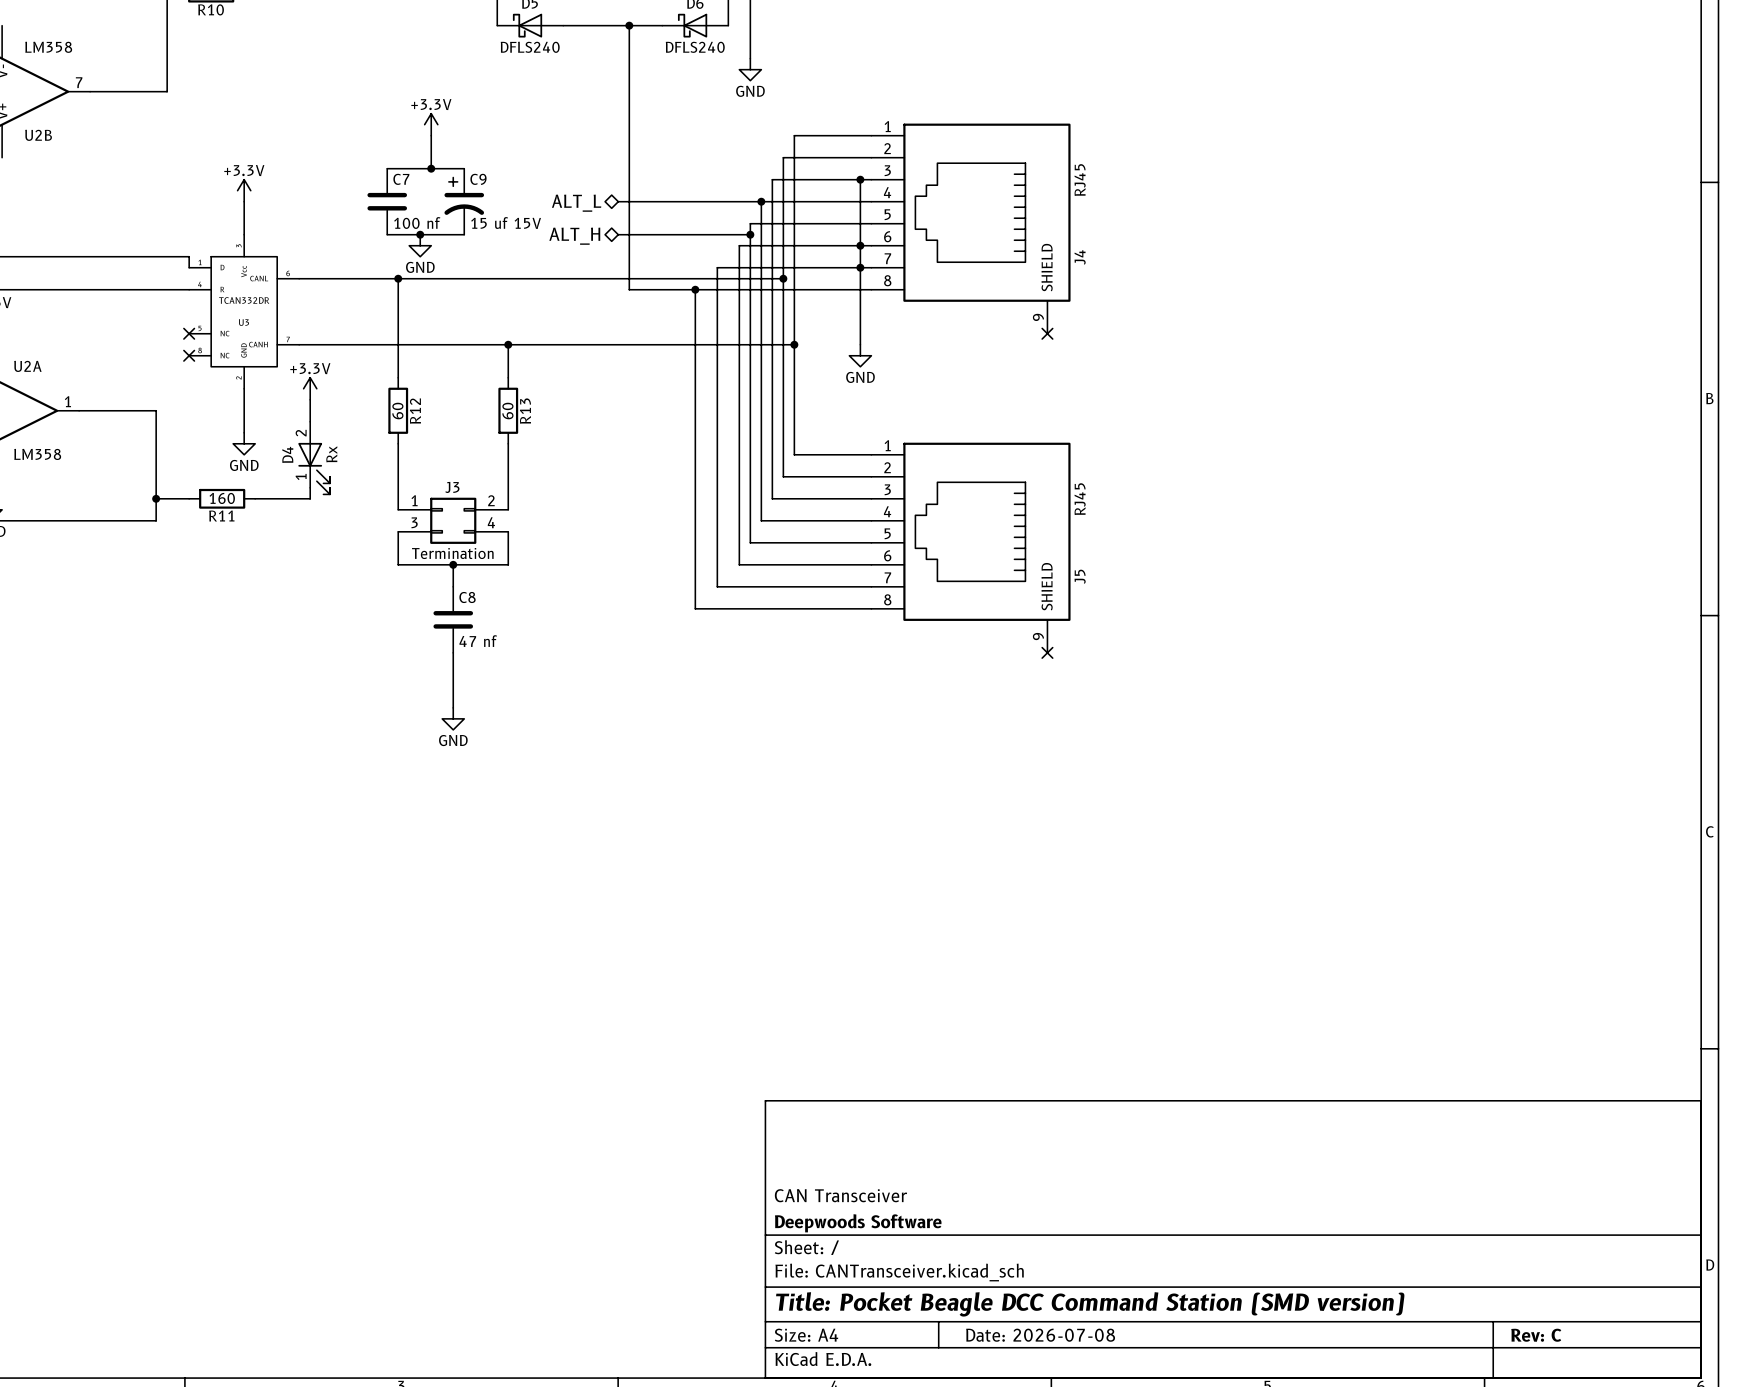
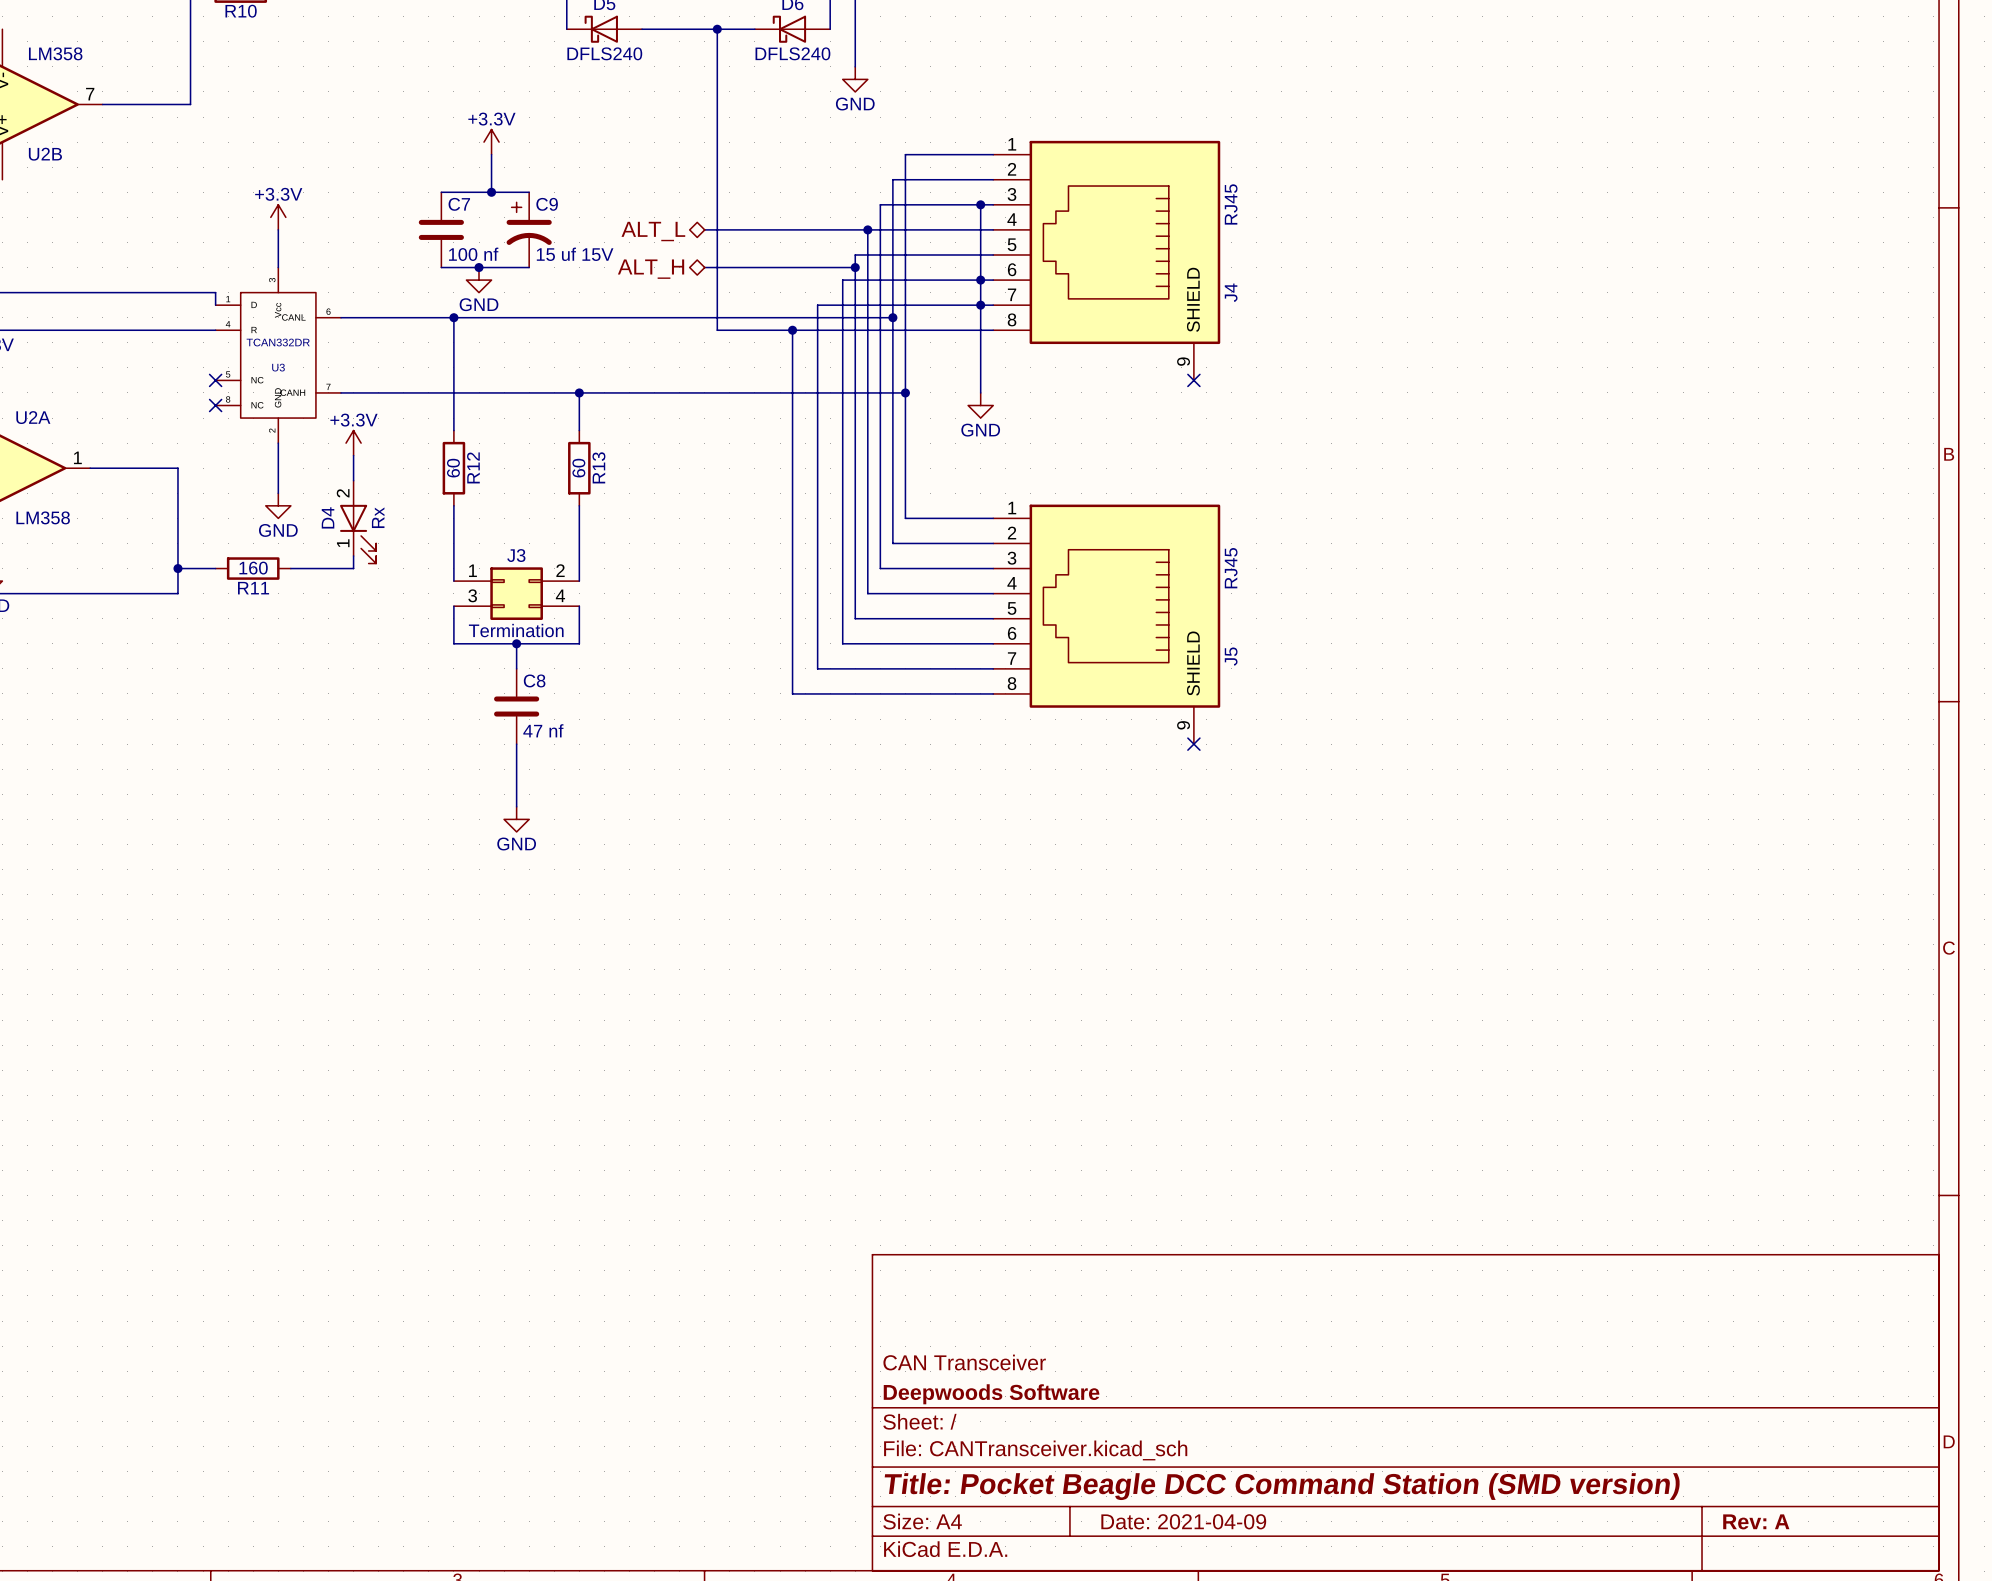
title block: Date: 2026-07-08 (1040, 1335) -> Date: 2021-04-09 (1183, 1521)
title block: Rev: C (1536, 1335) -> Rev: A (1756, 1521)

